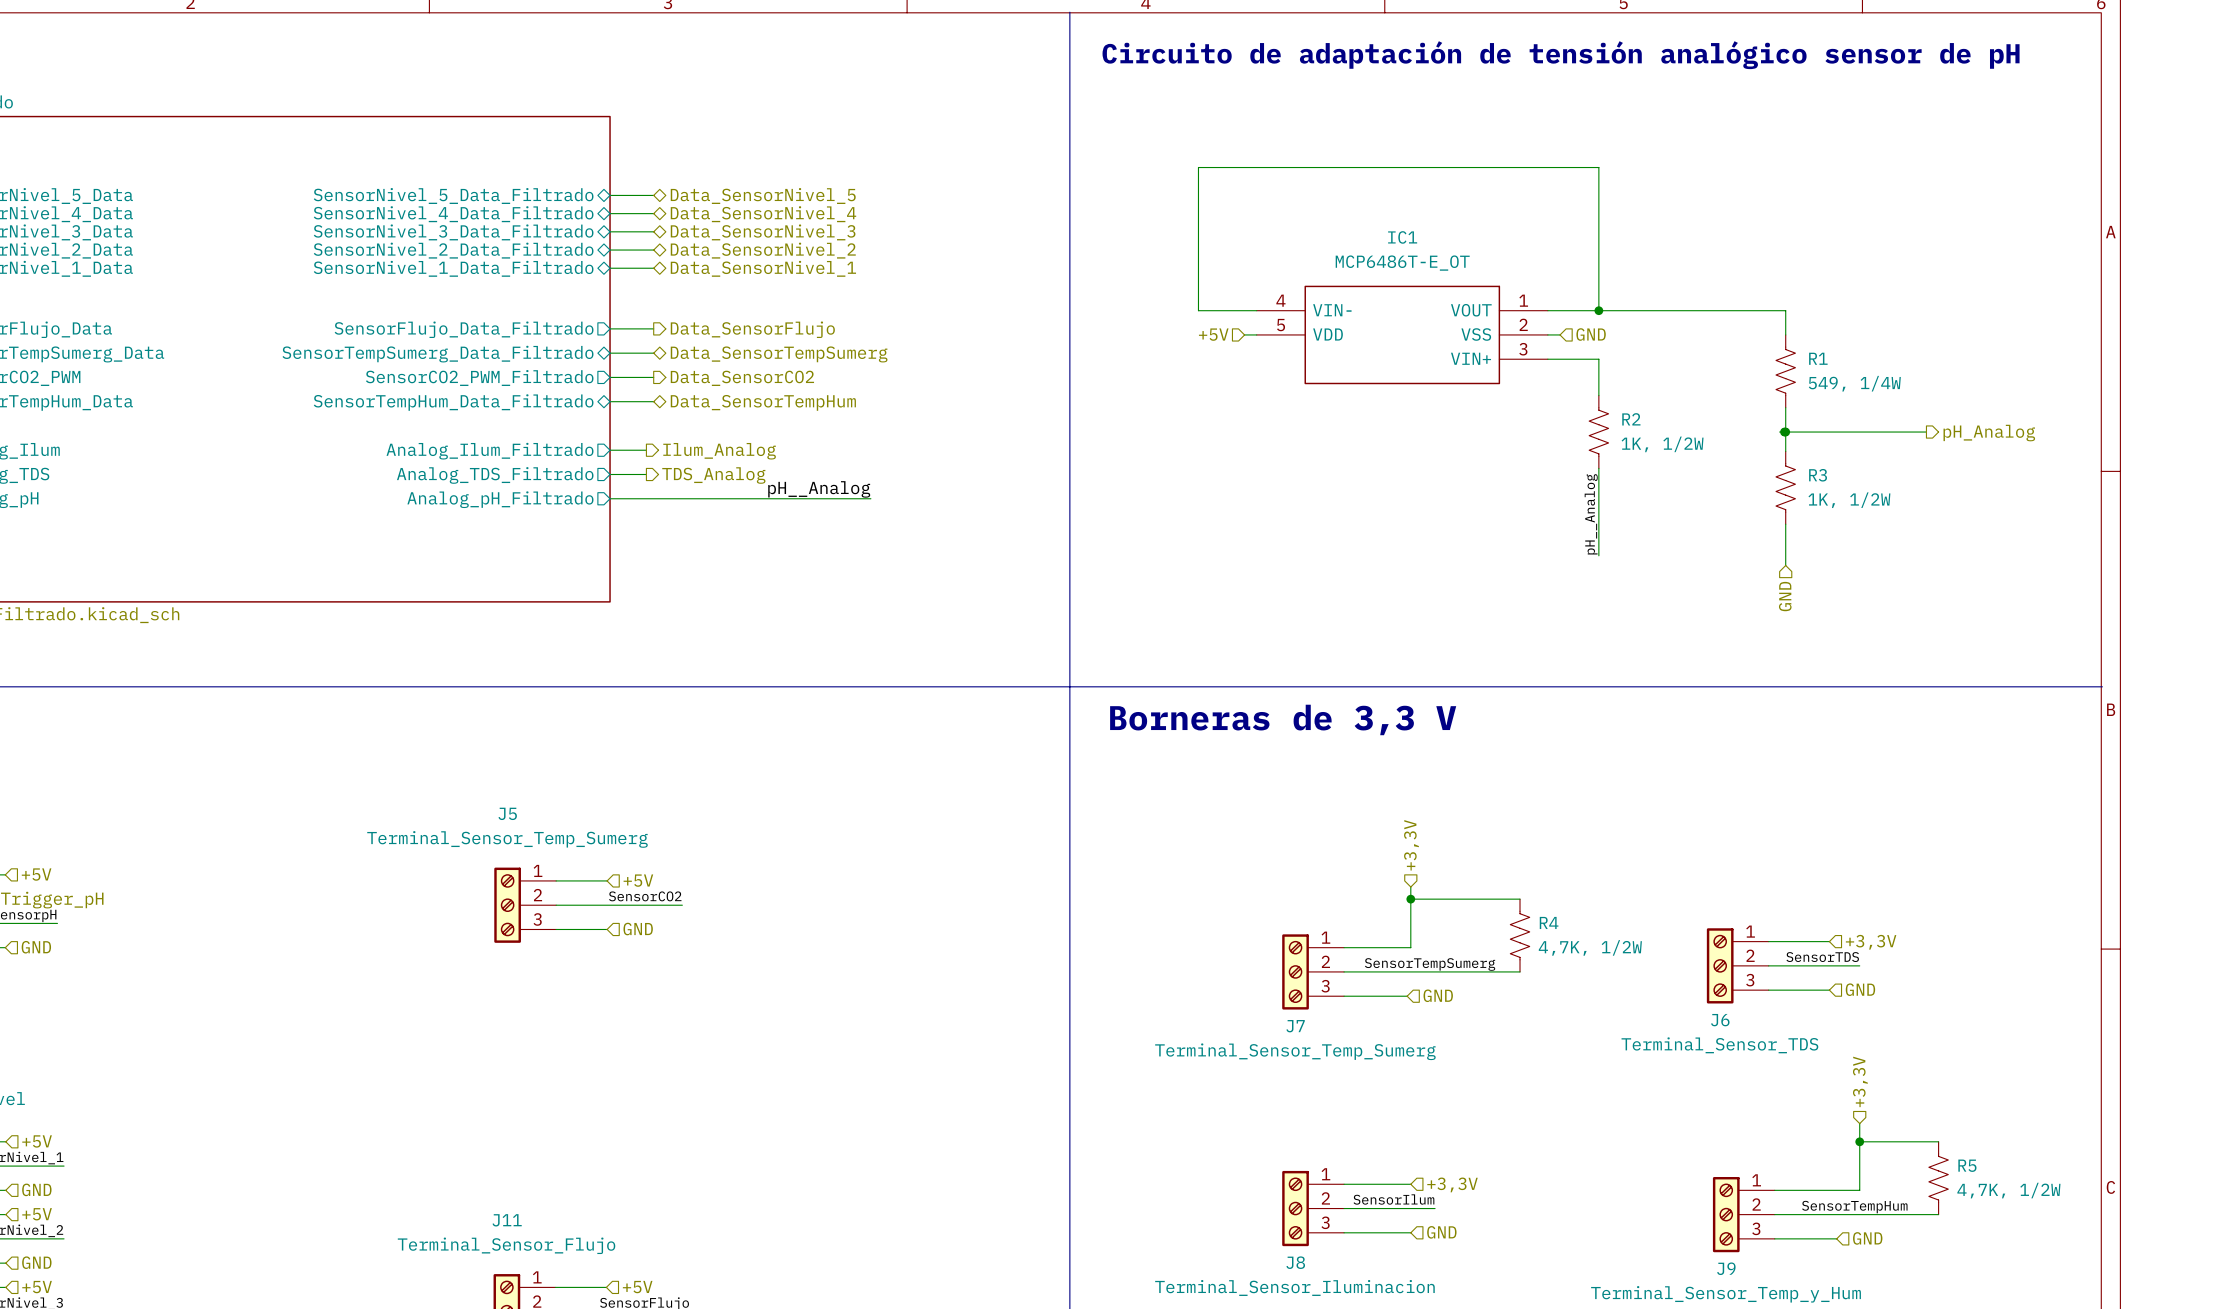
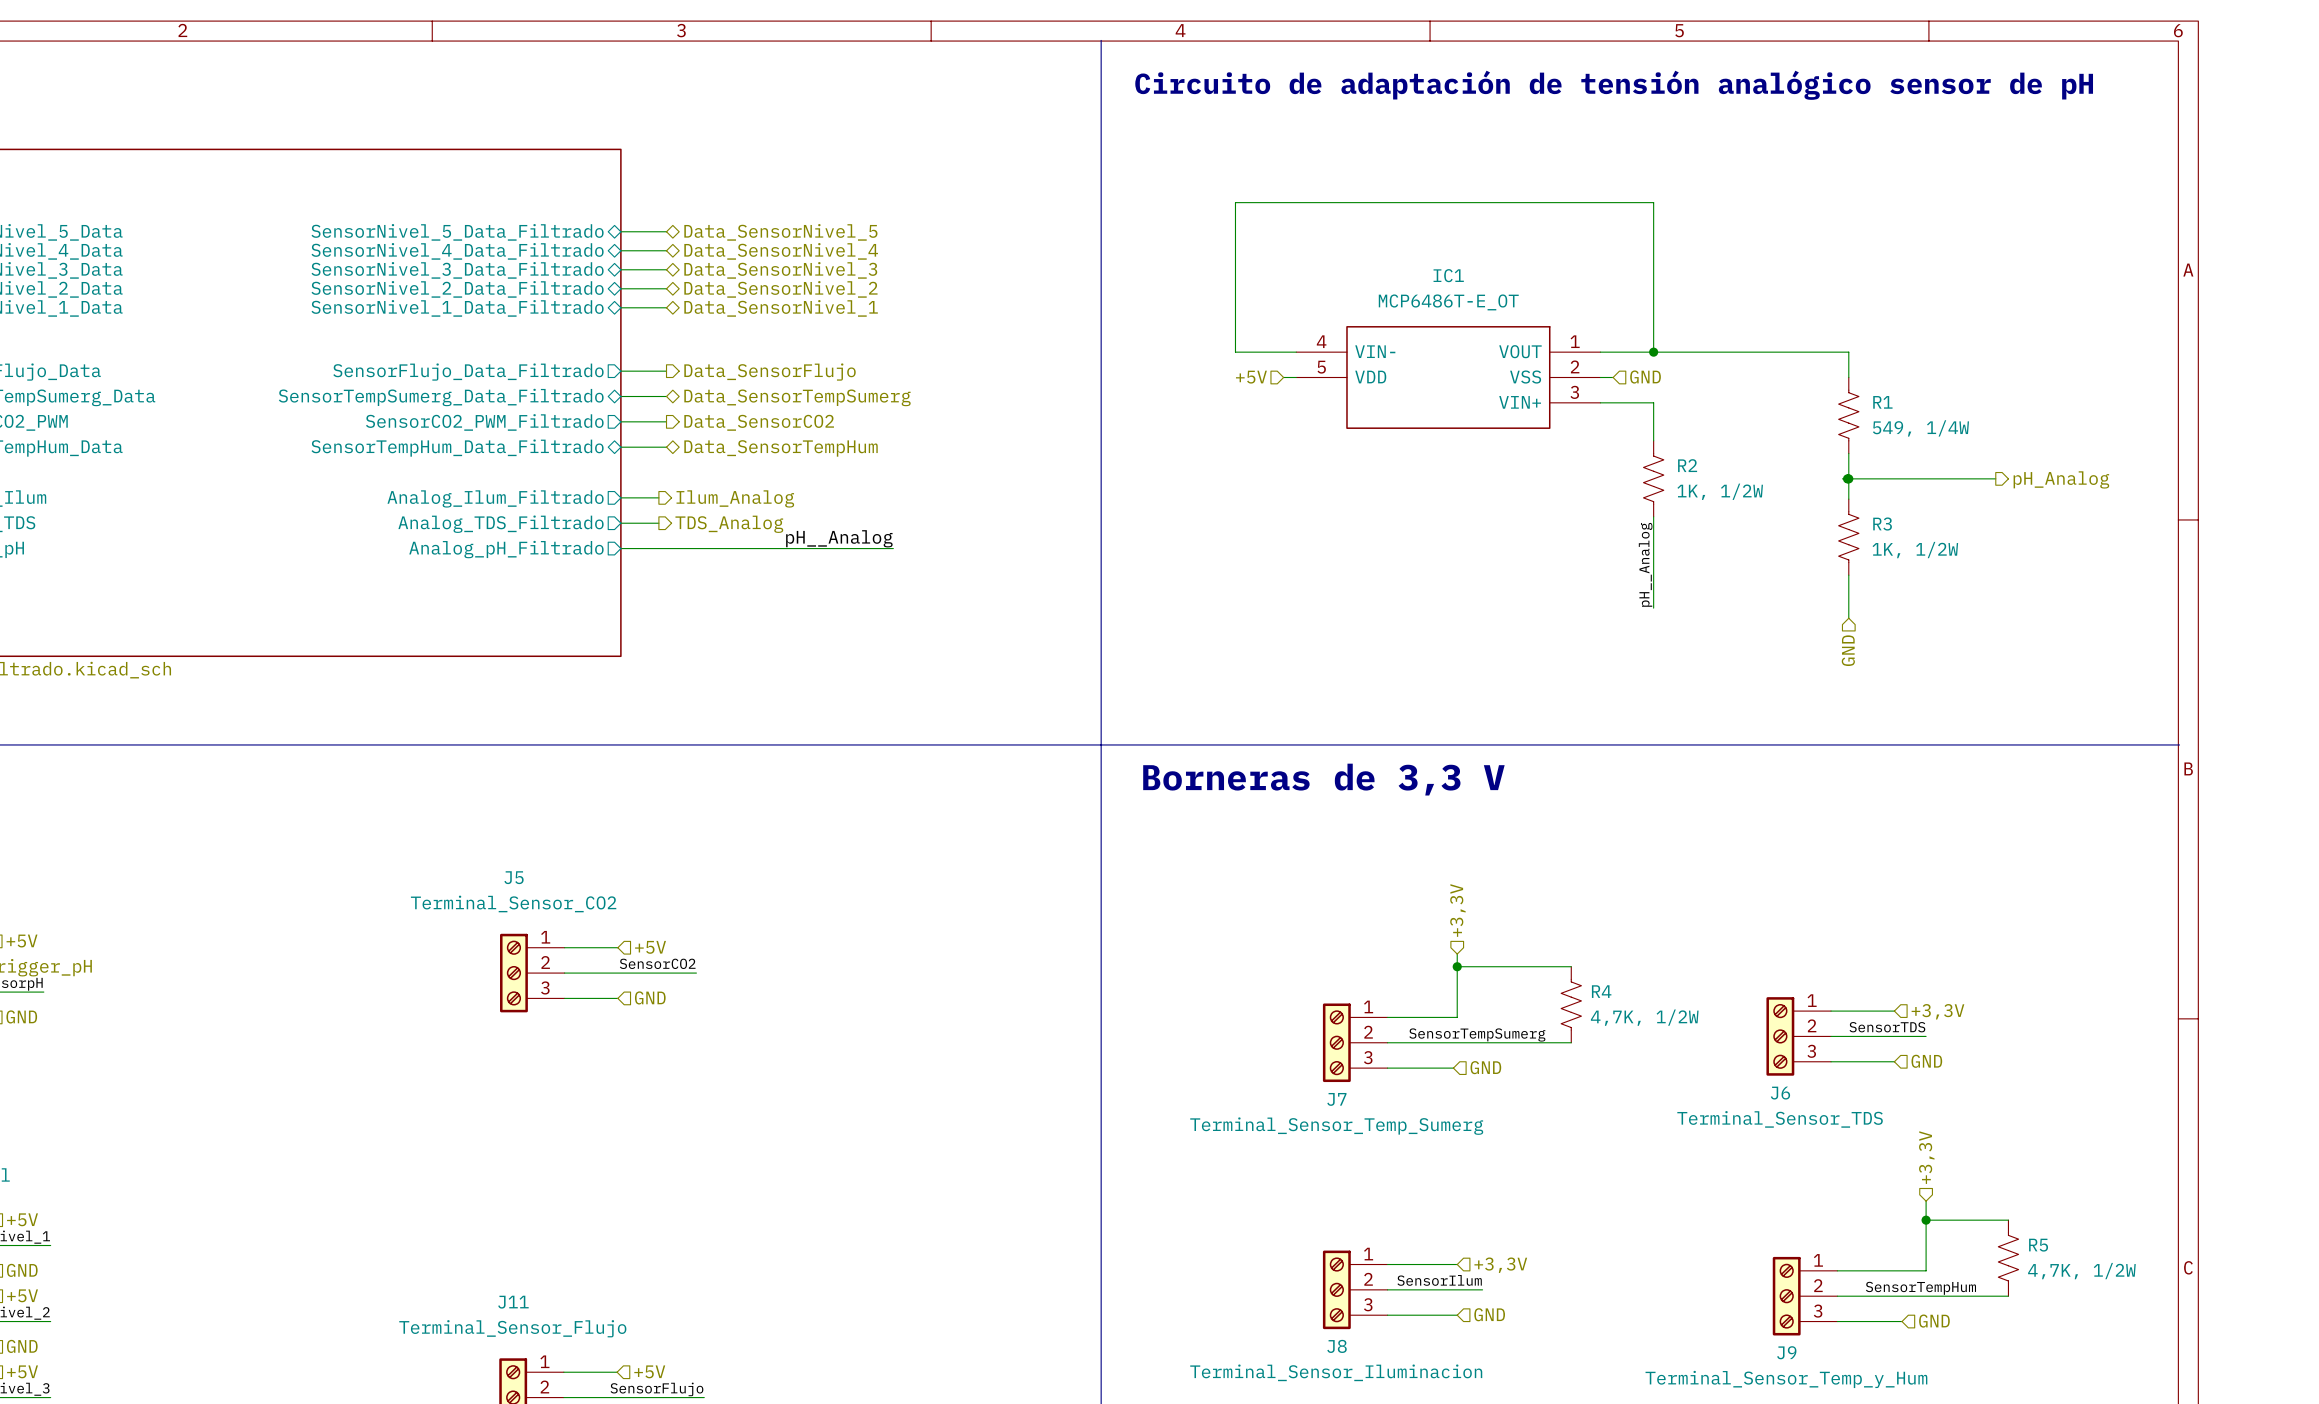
J5 value: Terminal_Sensor_Temp_Sumerg (507, 839) -> Terminal_Sensor_CO2 (513, 903)

